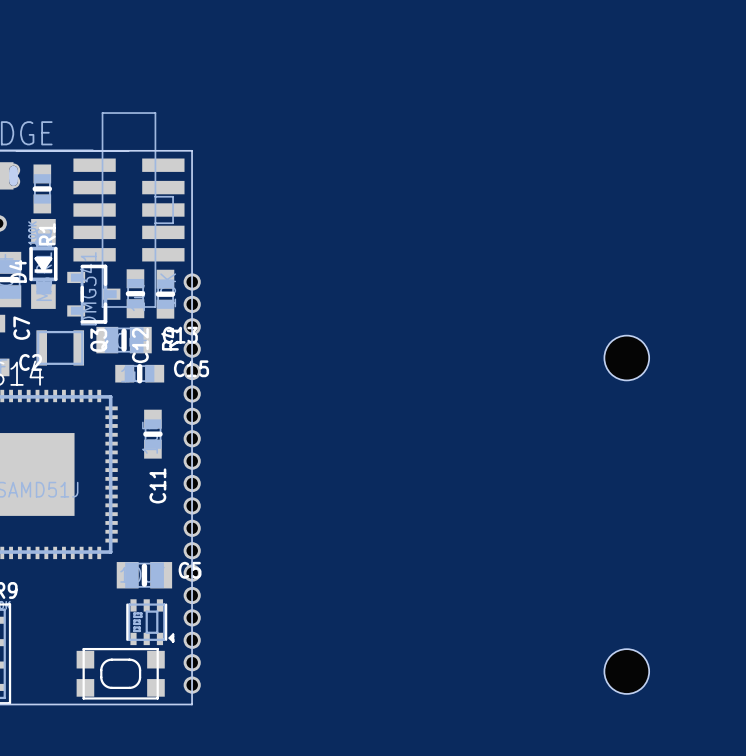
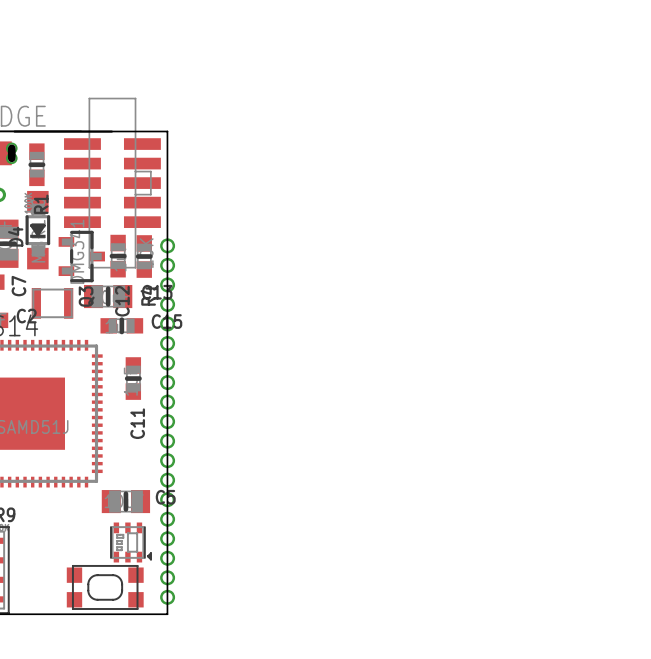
hole: (626, 358) -> none
hole: (626, 671) -> none

